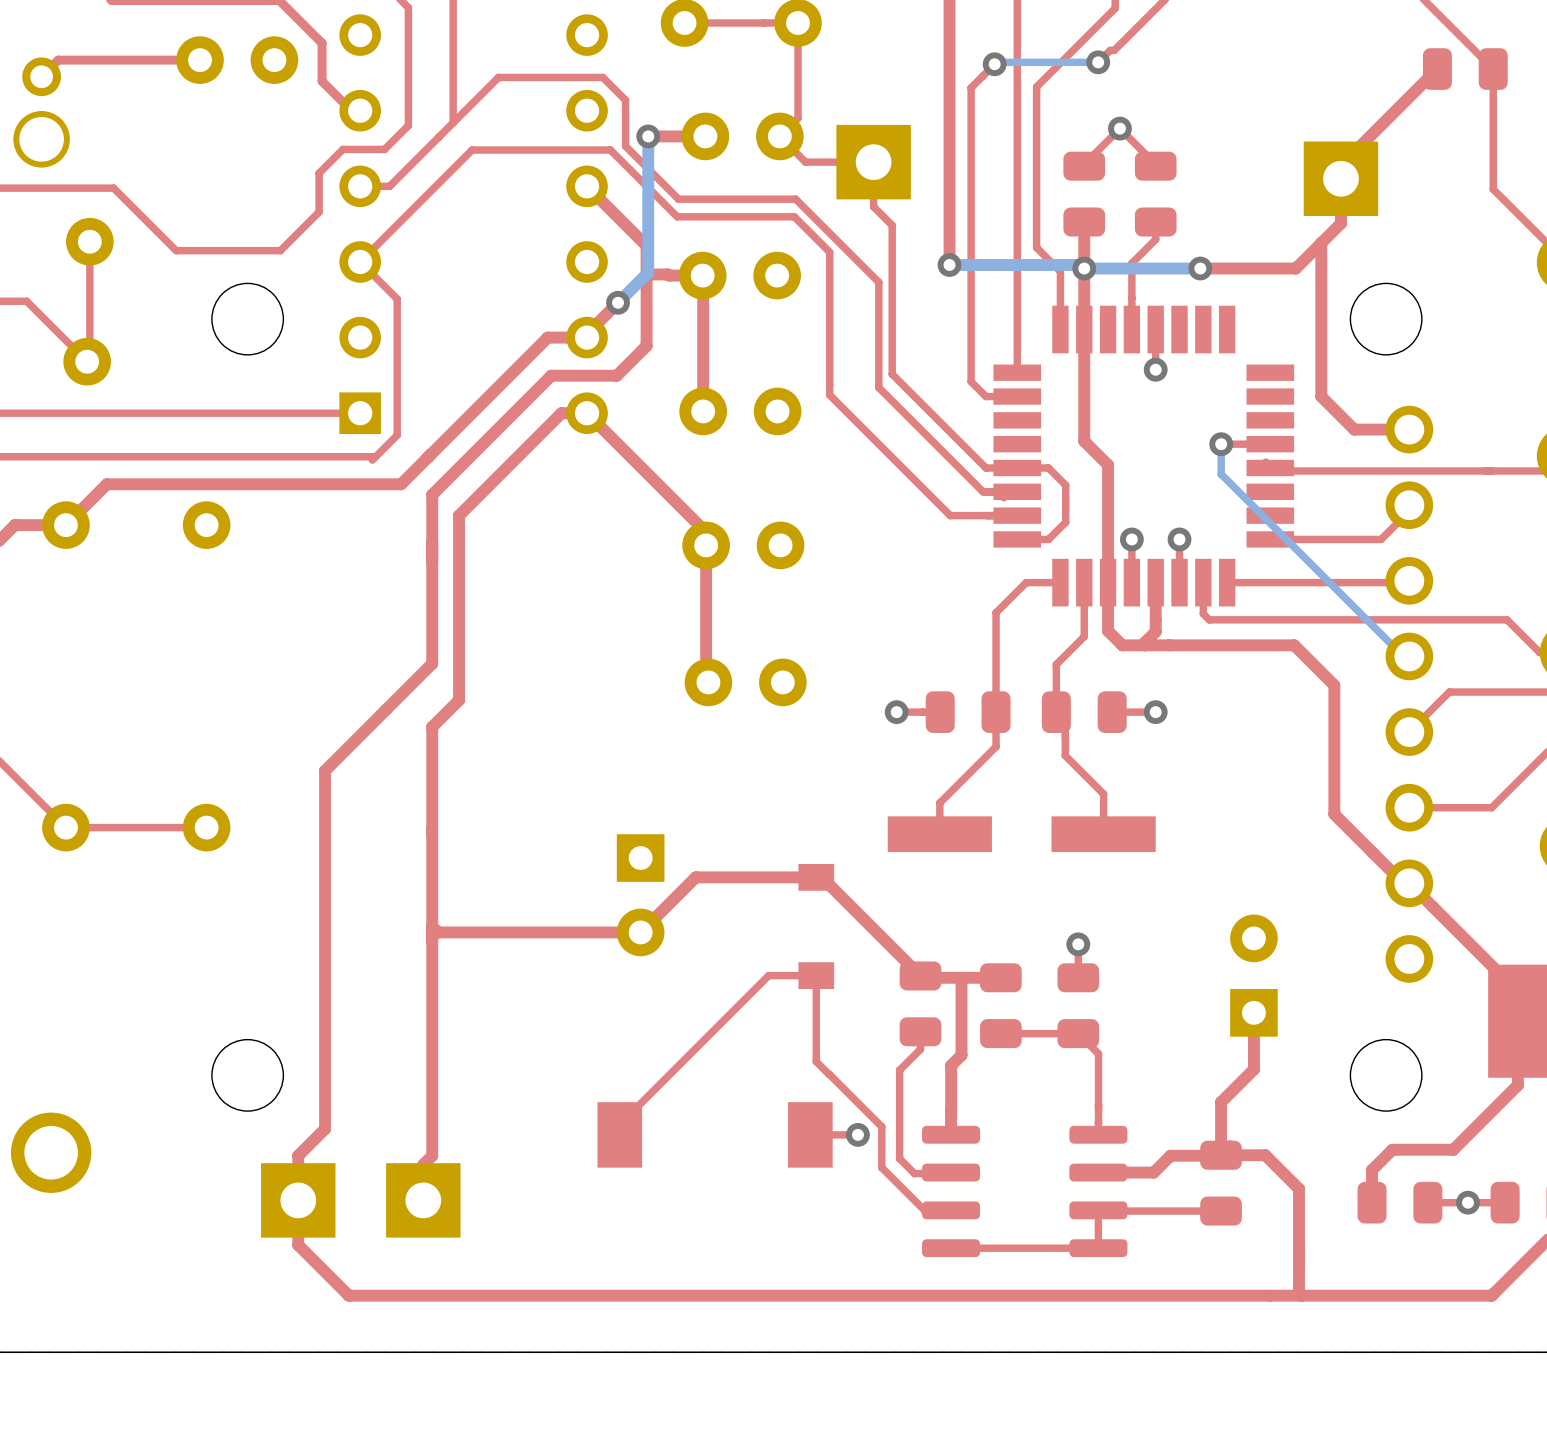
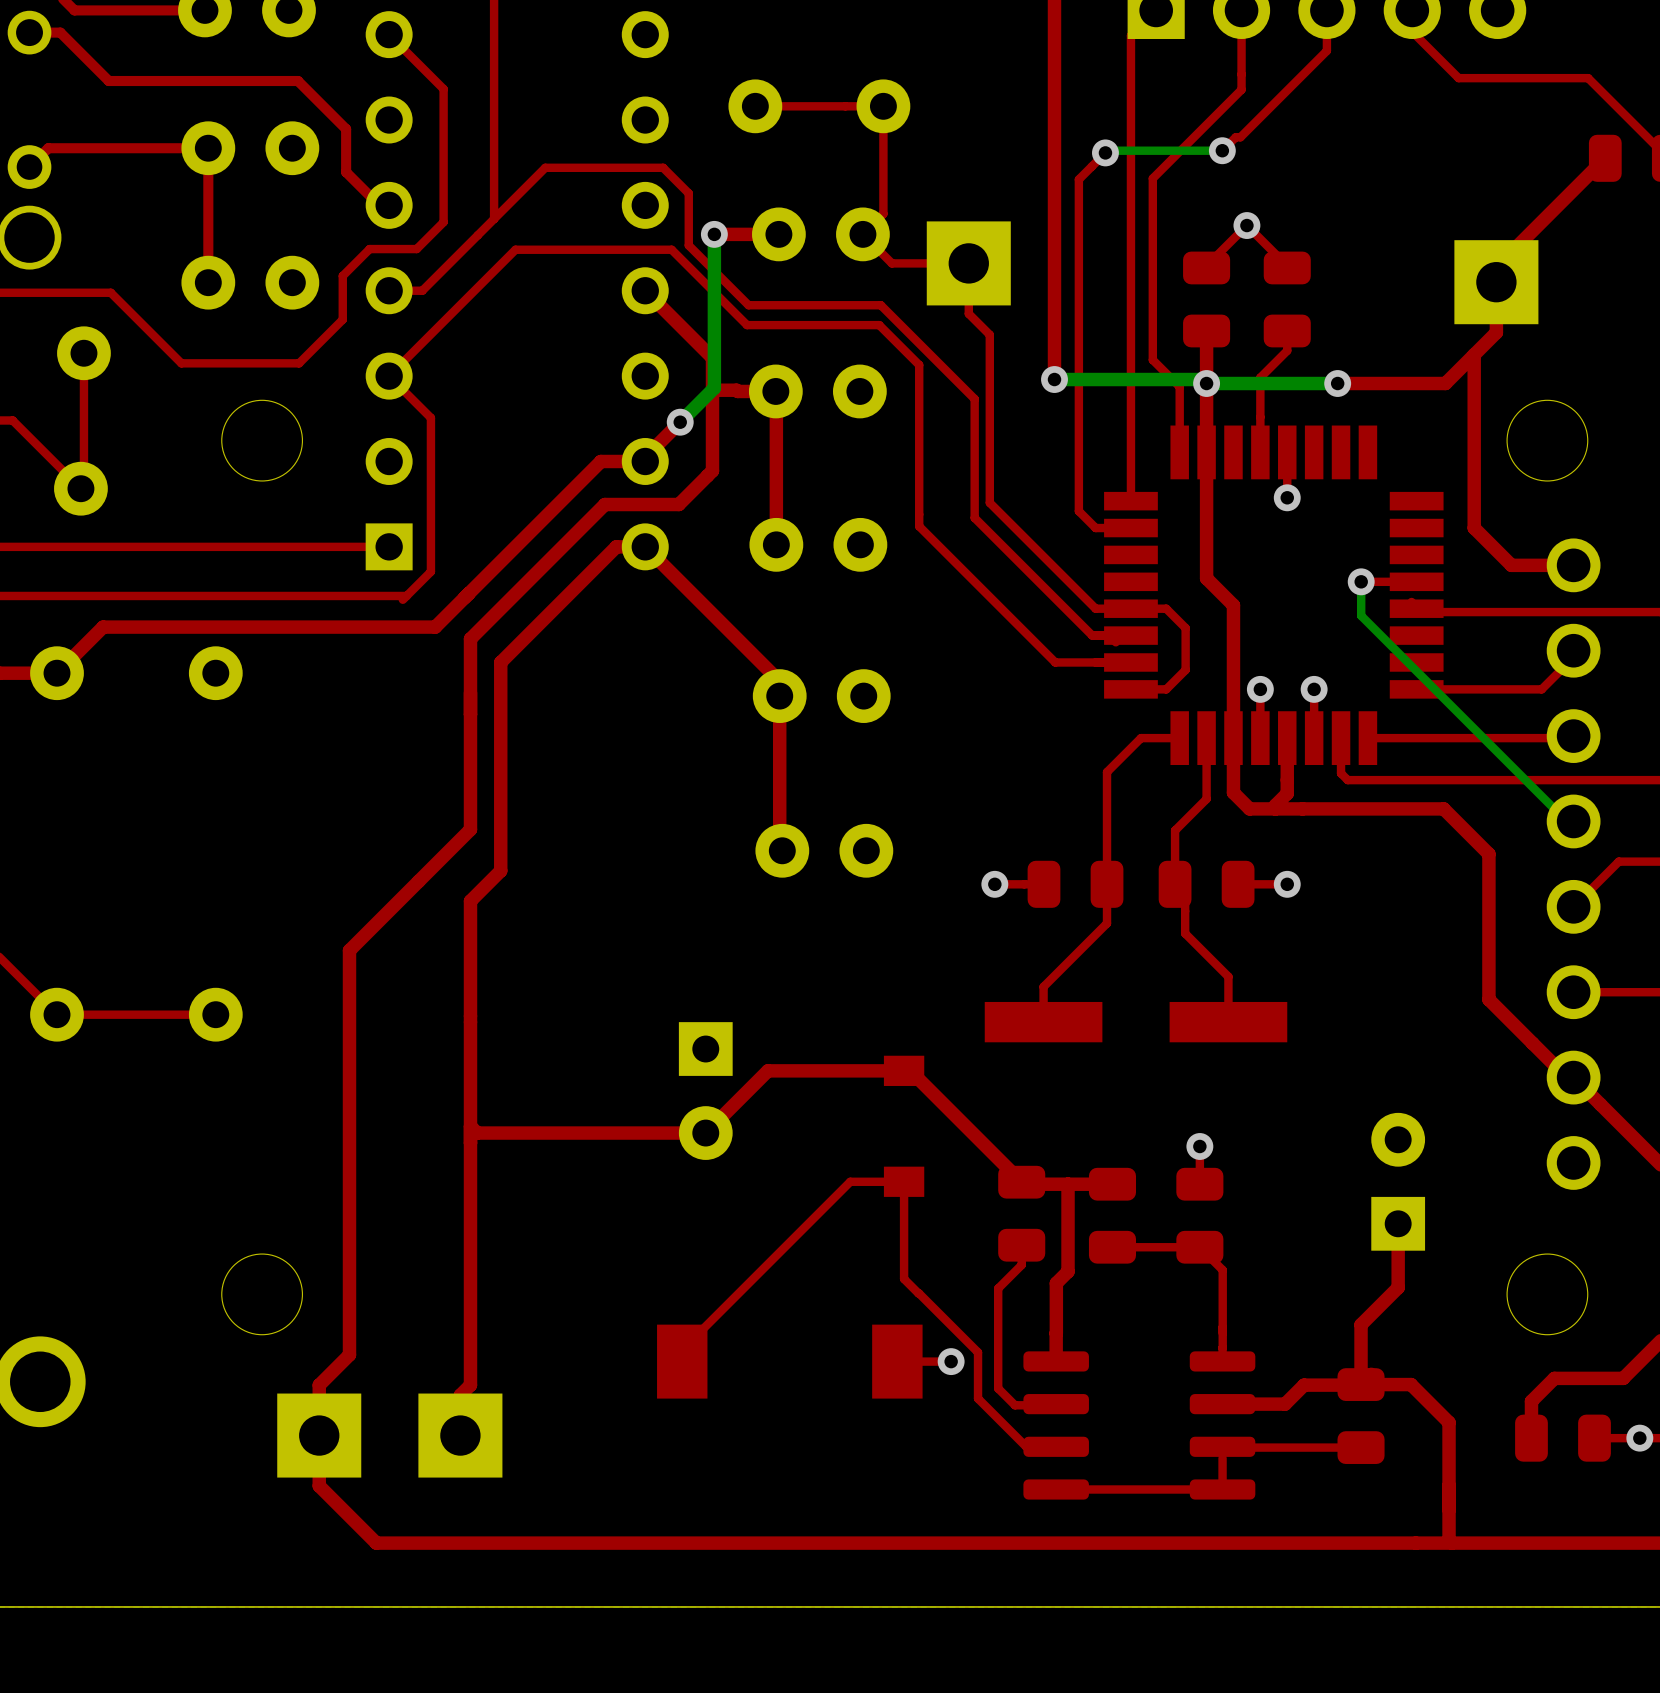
top track: none -> (208, 148) (208, 282)
part: none -> (250, 282)

